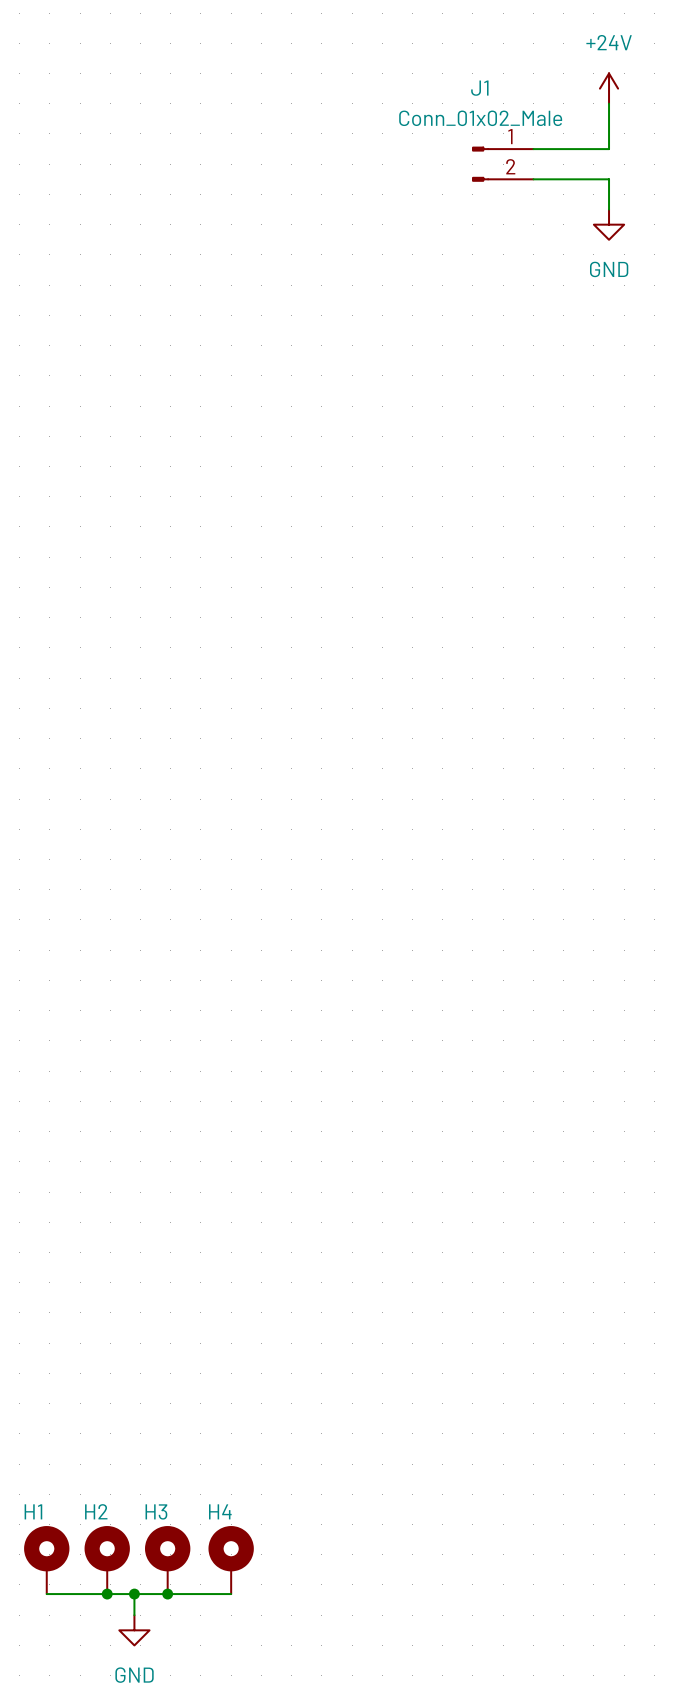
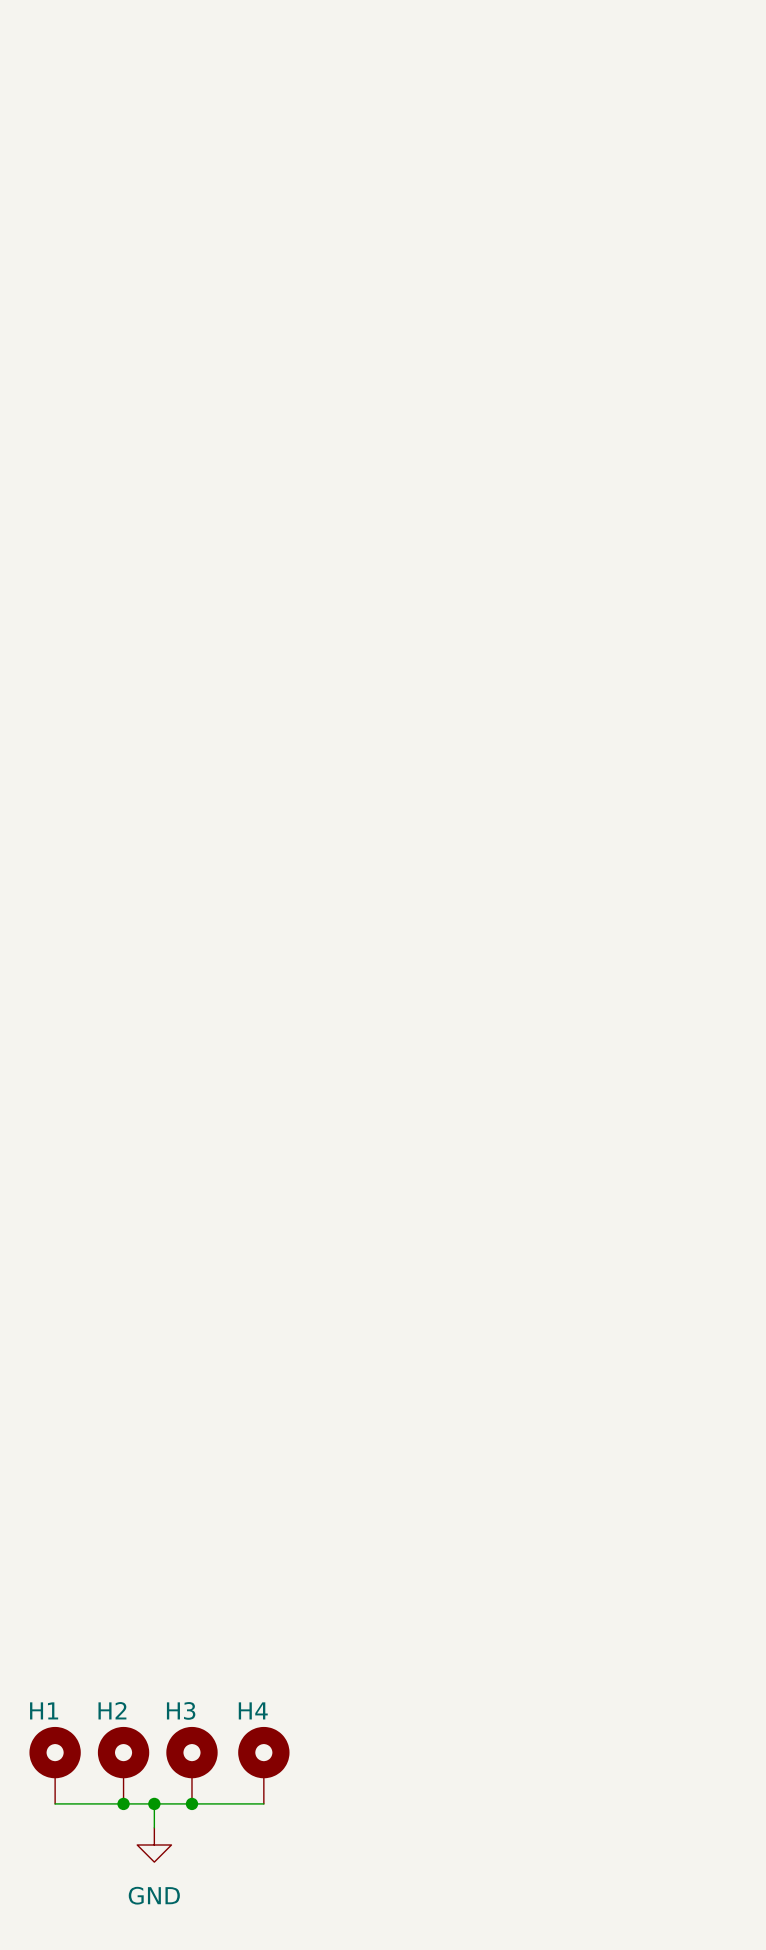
power symbol: +24V (609, 88) -> none
wire: (609, 103) (609, 149) (533, 149) -> none
J1: Conn_01x02_Male (502, 164) -> none
wire: (533, 179) (609, 179) (609, 209) -> none
power symbol: GND (609, 224) -> none

